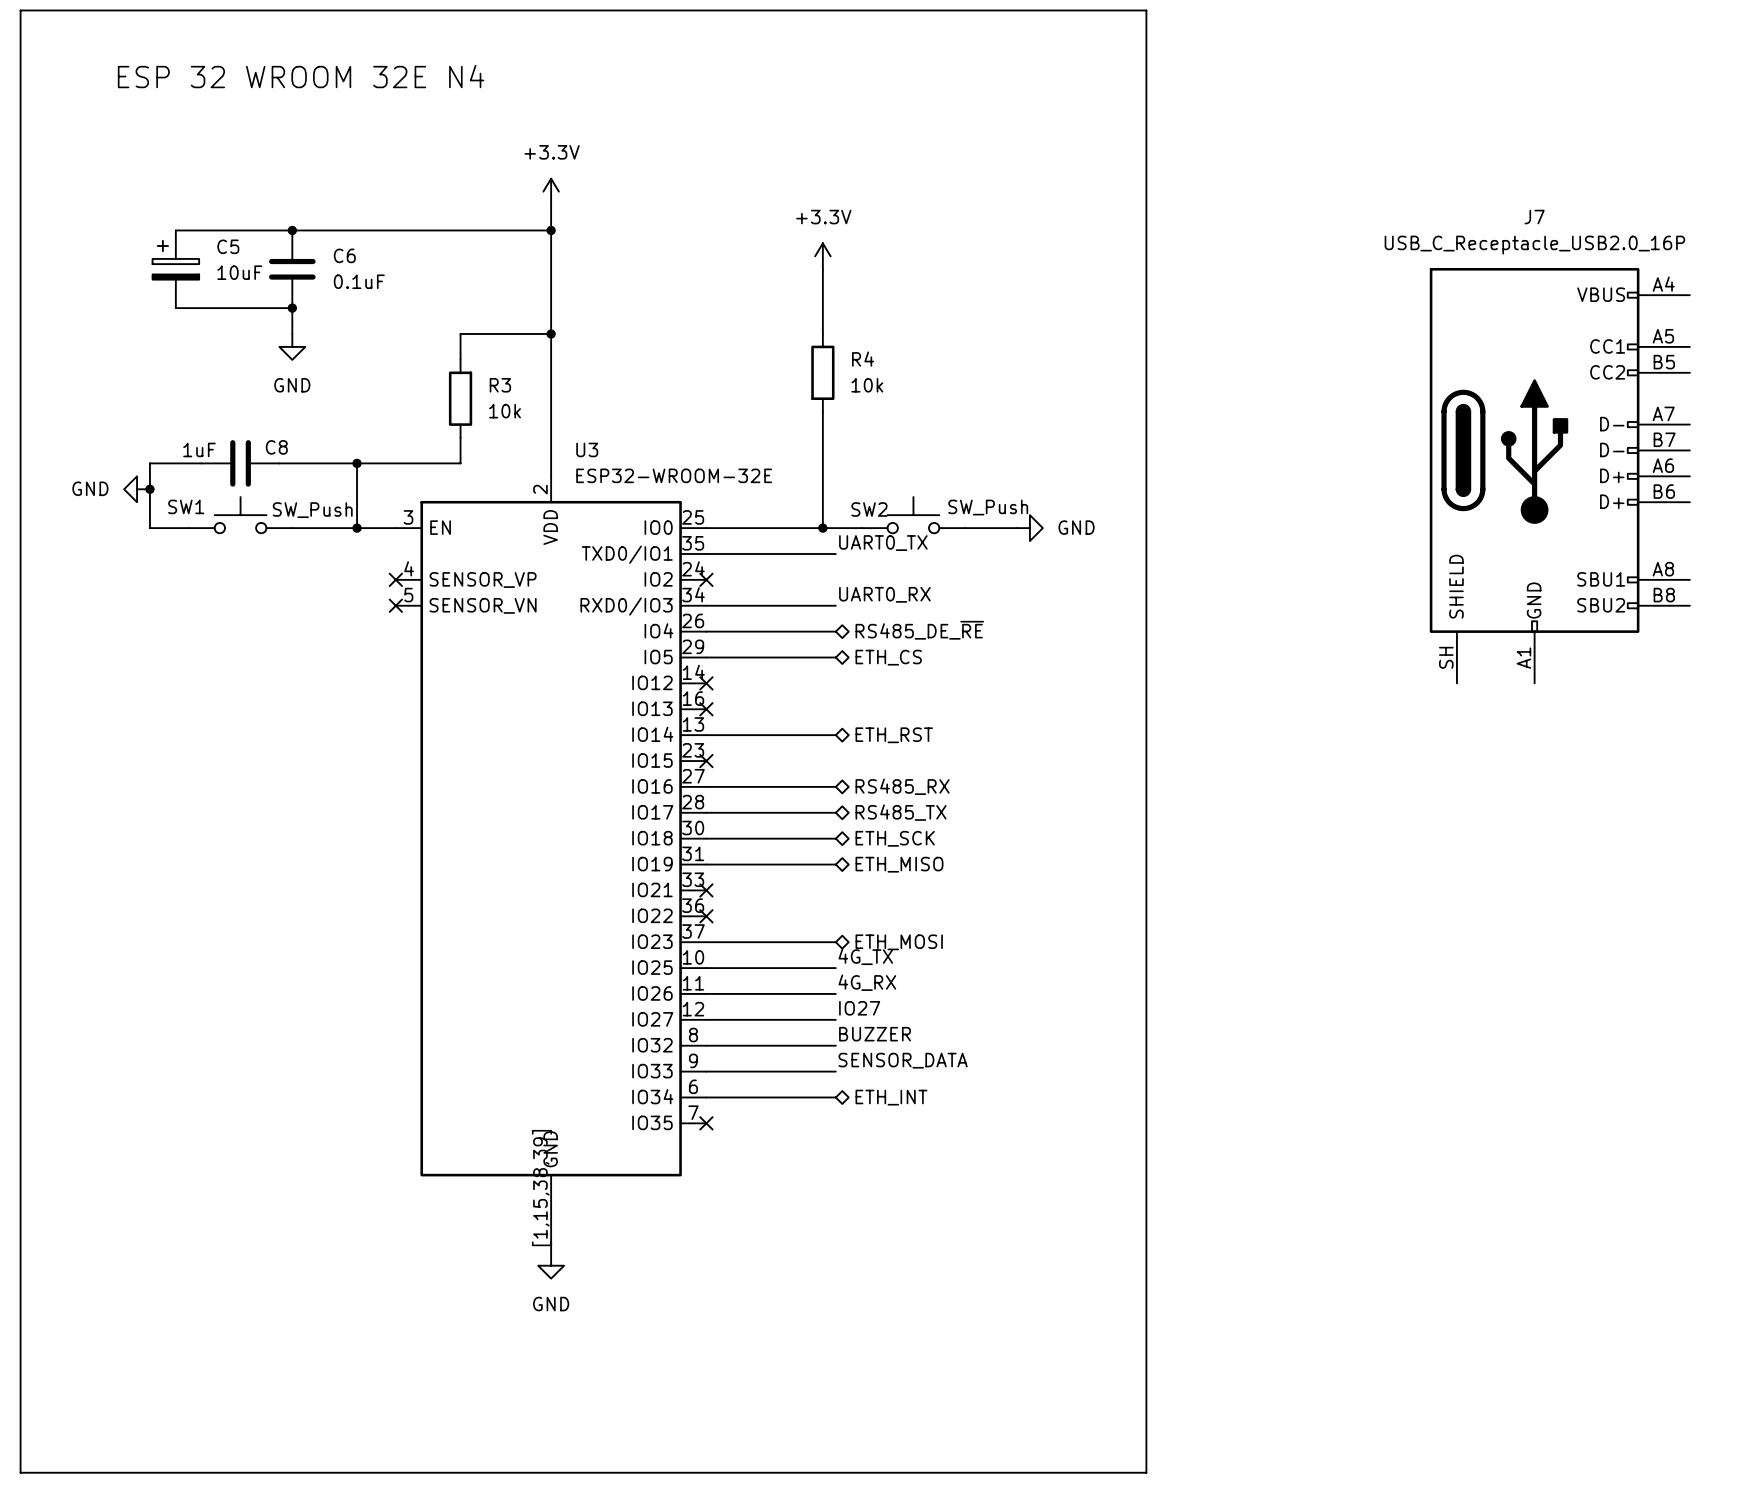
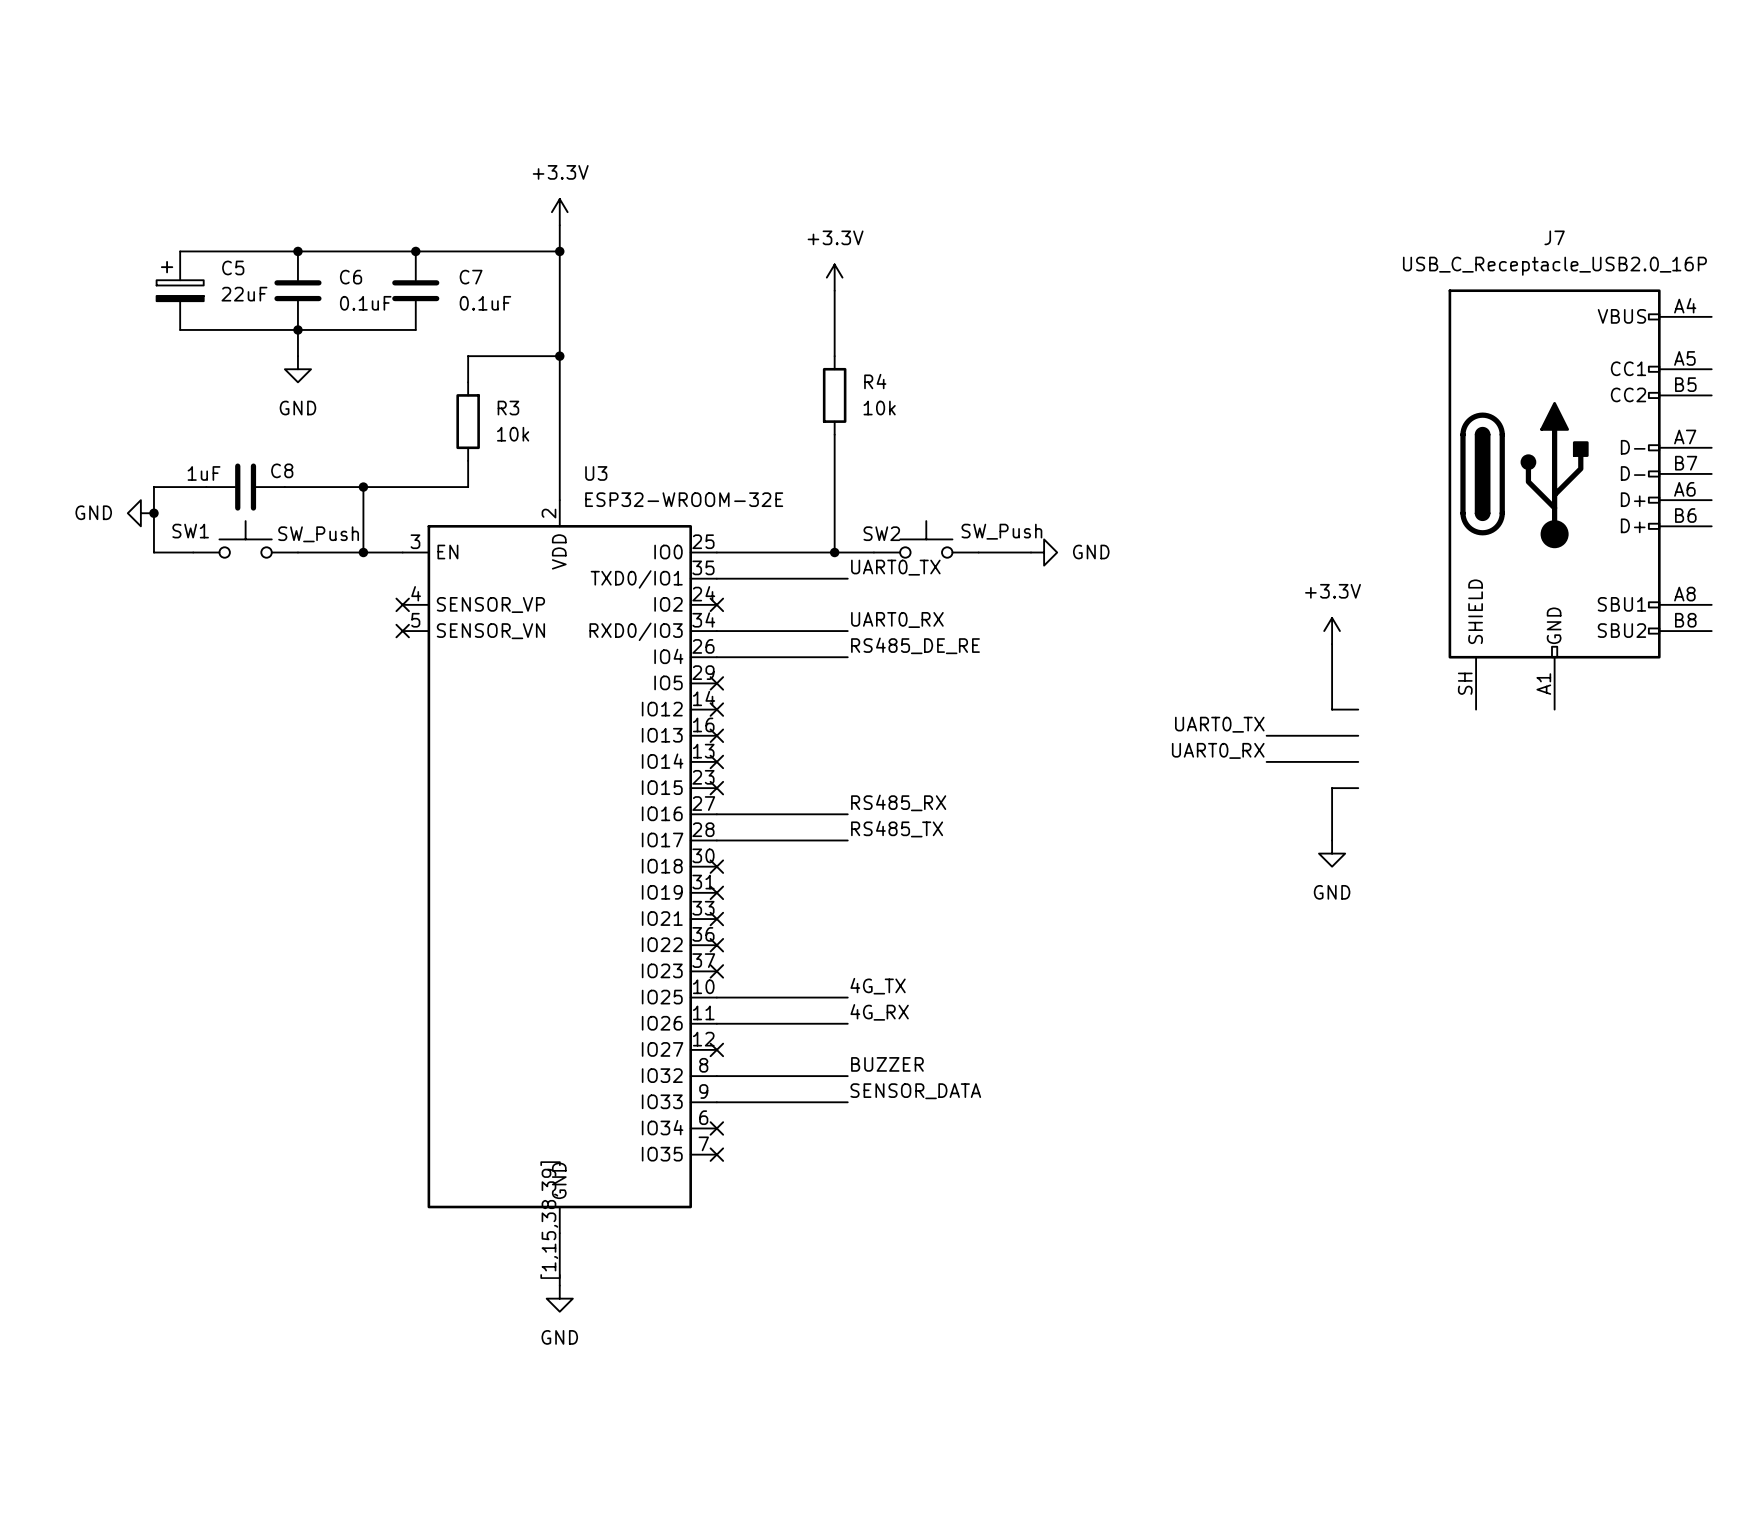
line: (20, 10) (1146, 10) (1146, 1472) (20, 1472) (20, 10) -> none
text: ESP 32 WROOM 32E N4 (301, 76) -> none
junction: none -> (415, 251)
C7: none -> 0.1uF (415, 290)
C5 value: 10uF (239, 272) -> 22uF (244, 294)
wire: none -> (297, 329) (415, 329)
power symbol: none -> +3.3V (1332, 631)
wire: none -> (1332, 644) (1332, 709) (1358, 709)
label: none -> RS485_DE_RE (915, 645)
hierarchical label: RS485_DE_~{RE} (919, 630) -> none
wire: (706, 657) (835, 657) -> none
no-connect mark: none -> (716, 683)
hierarchical label: ETH_CS (888, 657) -> none
label: none -> UART0_TX (1219, 724)
wire: none -> (1266, 735) (1358, 735)
label: none -> UART0_RX (1218, 750)
wire: (706, 735) (835, 735) -> none
no-connect mark: none -> (716, 761)
hierarchical label: ETH_RST (894, 735) -> none
wire: none -> (1266, 761) (1358, 761)
wire: none -> (1358, 788) (1332, 788) (1332, 840)
label: none -> RS485_RX (898, 802)
hierarchical label: RS485_RX (902, 786) -> none
label: none -> RS485_TX (897, 829)
hierarchical label: RS485_TX (901, 812) -> none
power symbol: none -> GND (1332, 853)
wire: (706, 838) (835, 838) -> none
no-connect mark: none -> (716, 866)
hierarchical label: ETH_SCK (895, 838) -> none
wire: (706, 864) (835, 864) -> none
no-connect mark: none -> (716, 892)
hierarchical label: ETH_MISO (899, 864) -> none
wire: (706, 942) (835, 942) -> none
no-connect mark: none -> (716, 971)
hierarchical label: ETH_MOSI (899, 942) -> none
label: IO27 (859, 1008) -> none
wire: (706, 1019) (835, 1019) -> none
no-connect mark: none -> (716, 1049)
wire: (706, 1097) (835, 1097) -> none
no-connect mark: none -> (716, 1128)
hierarchical label: ETH_INT (891, 1097) -> none

